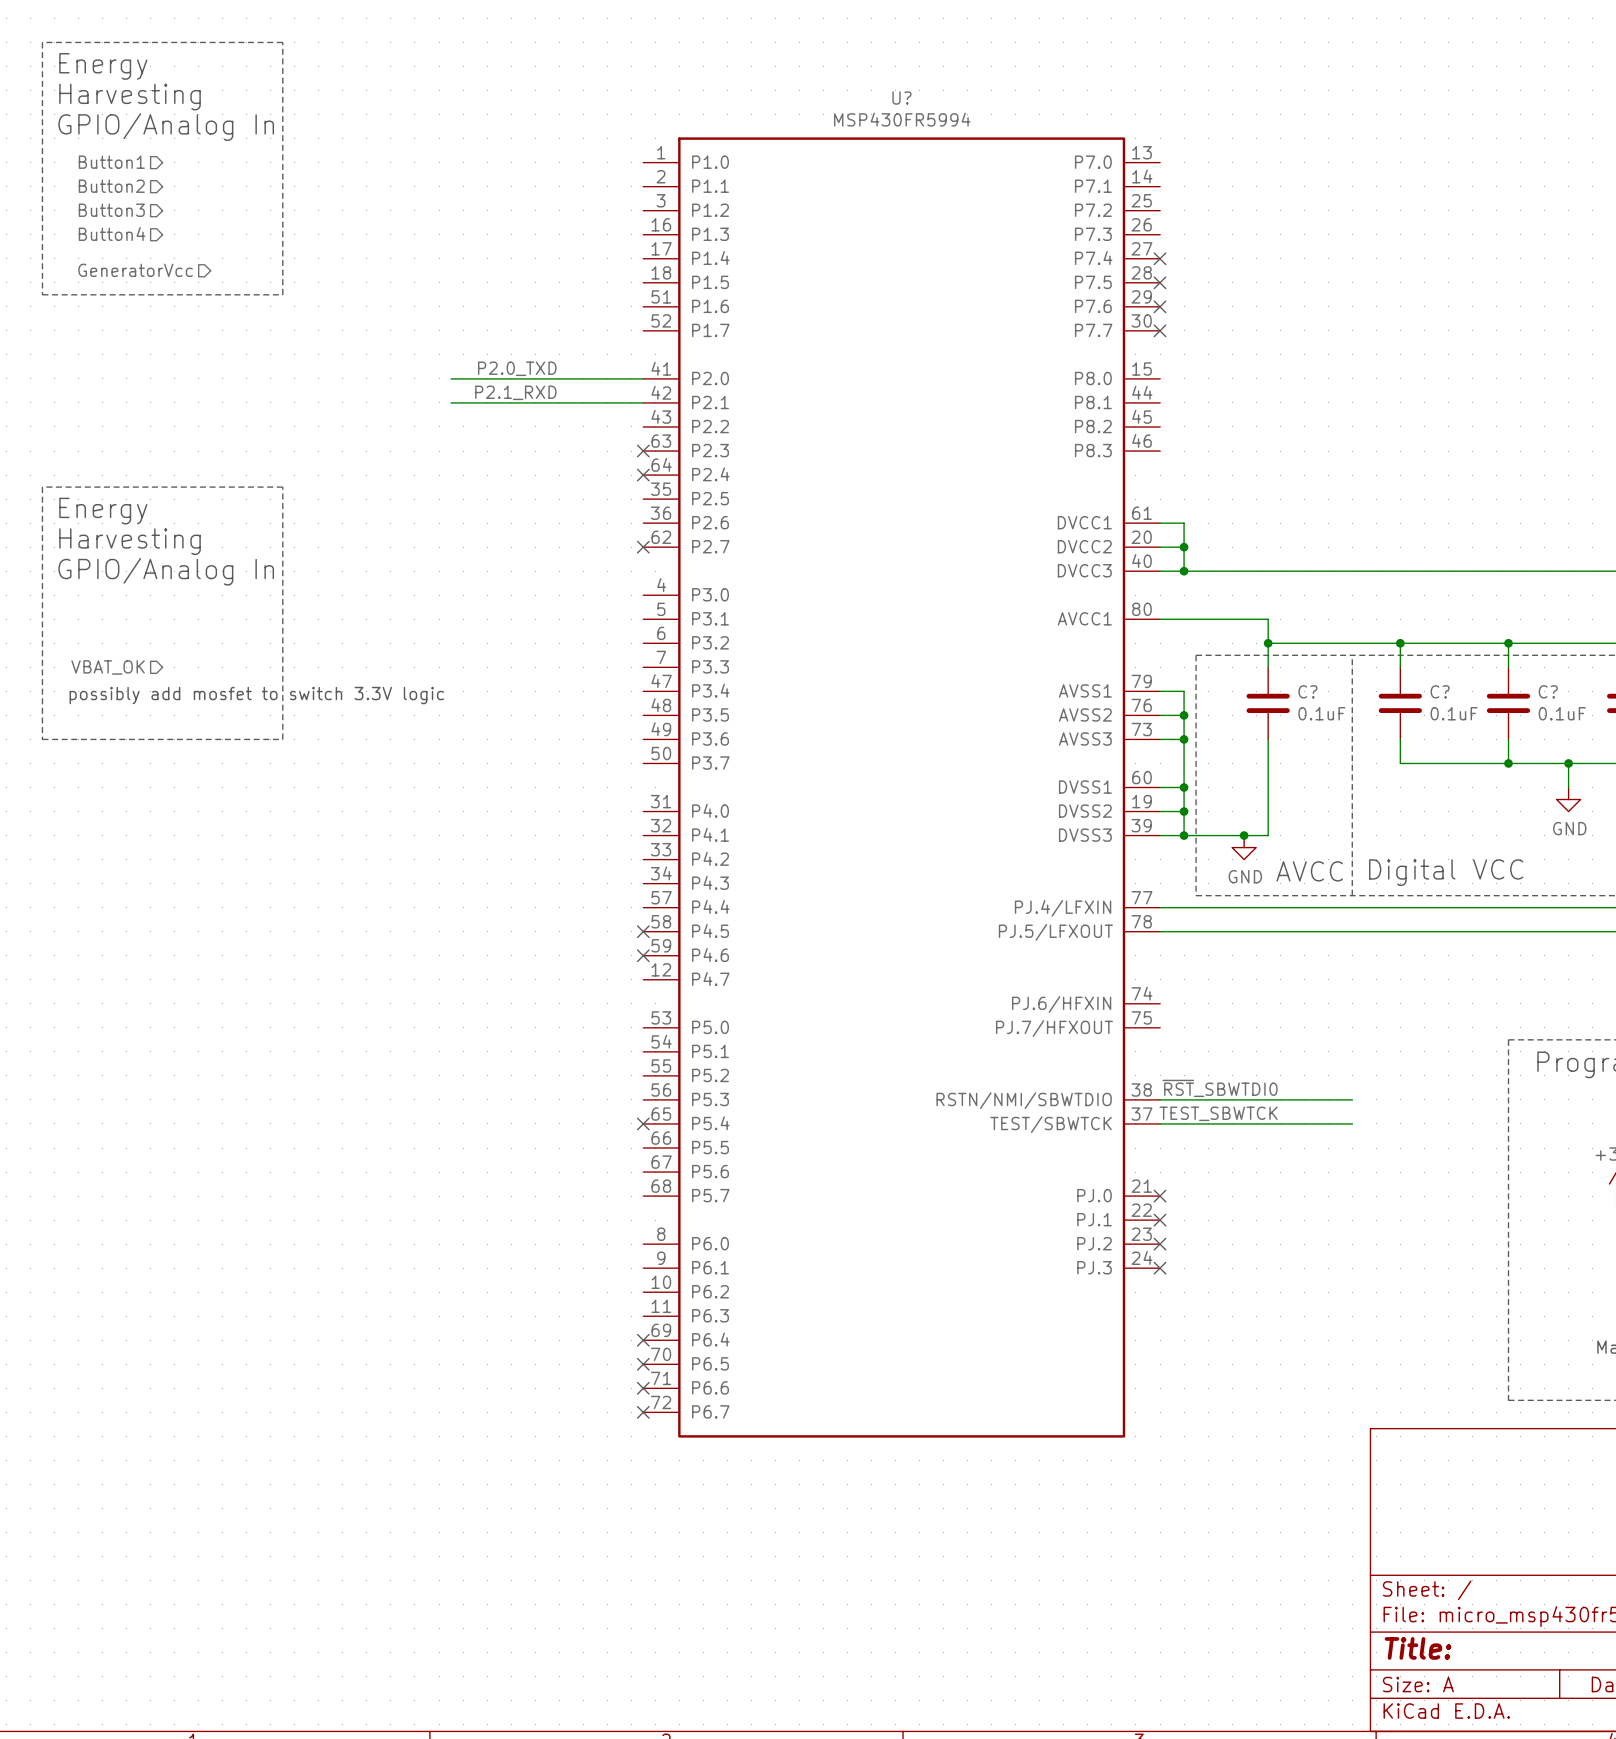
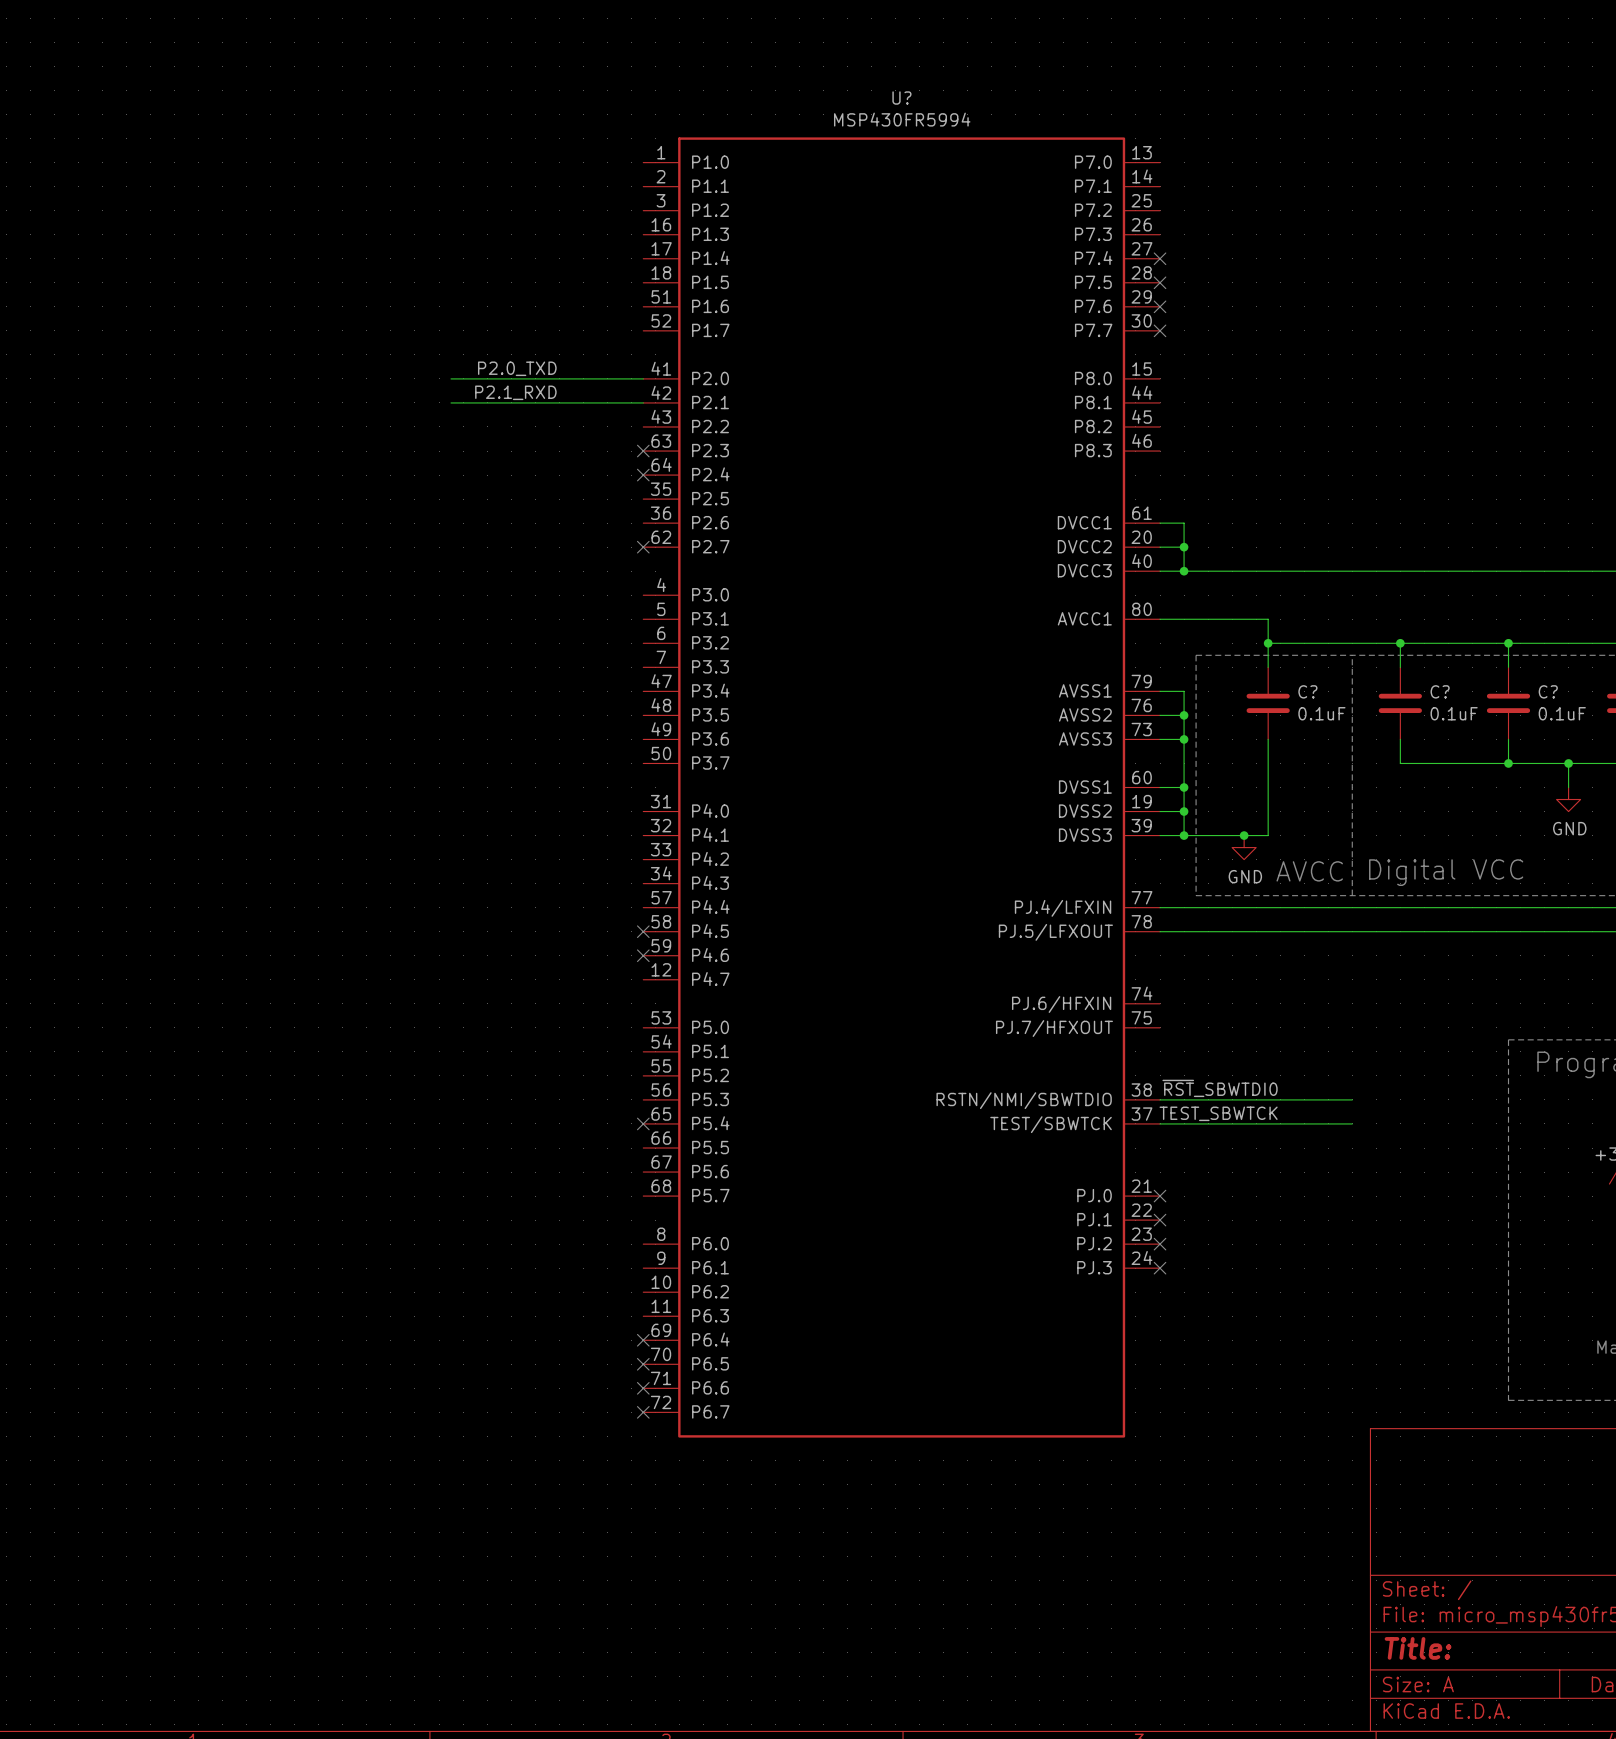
line: (42, 42) (282, 42) (282, 294) (42, 294) (42, 42) -> none
text: Energy (103, 66) -> none
text: Harvesting (130, 97) -> none
text: GPIO/Analog In (166, 127) -> none
hierarchical label: Button1 (111, 162) -> none
hierarchical label: Button2 (111, 186) -> none
hierarchical label: Button3 (111, 210) -> none
hierarchical label: Button4 (112, 233) -> none
hierarchical label: GeneratorVcc (135, 270) -> none
line: (42, 487) (42, 739) (282, 739) (282, 487) (42, 487) -> none
text: Energy (103, 511) -> none
text: Harvesting (130, 541) -> none
text: GPIO/Analog In (166, 571) -> none
hierarchical label: VBAT_OK (108, 667) -> none
text: possibly add mosfet to switch 3.3V logic (256, 695) -> none

